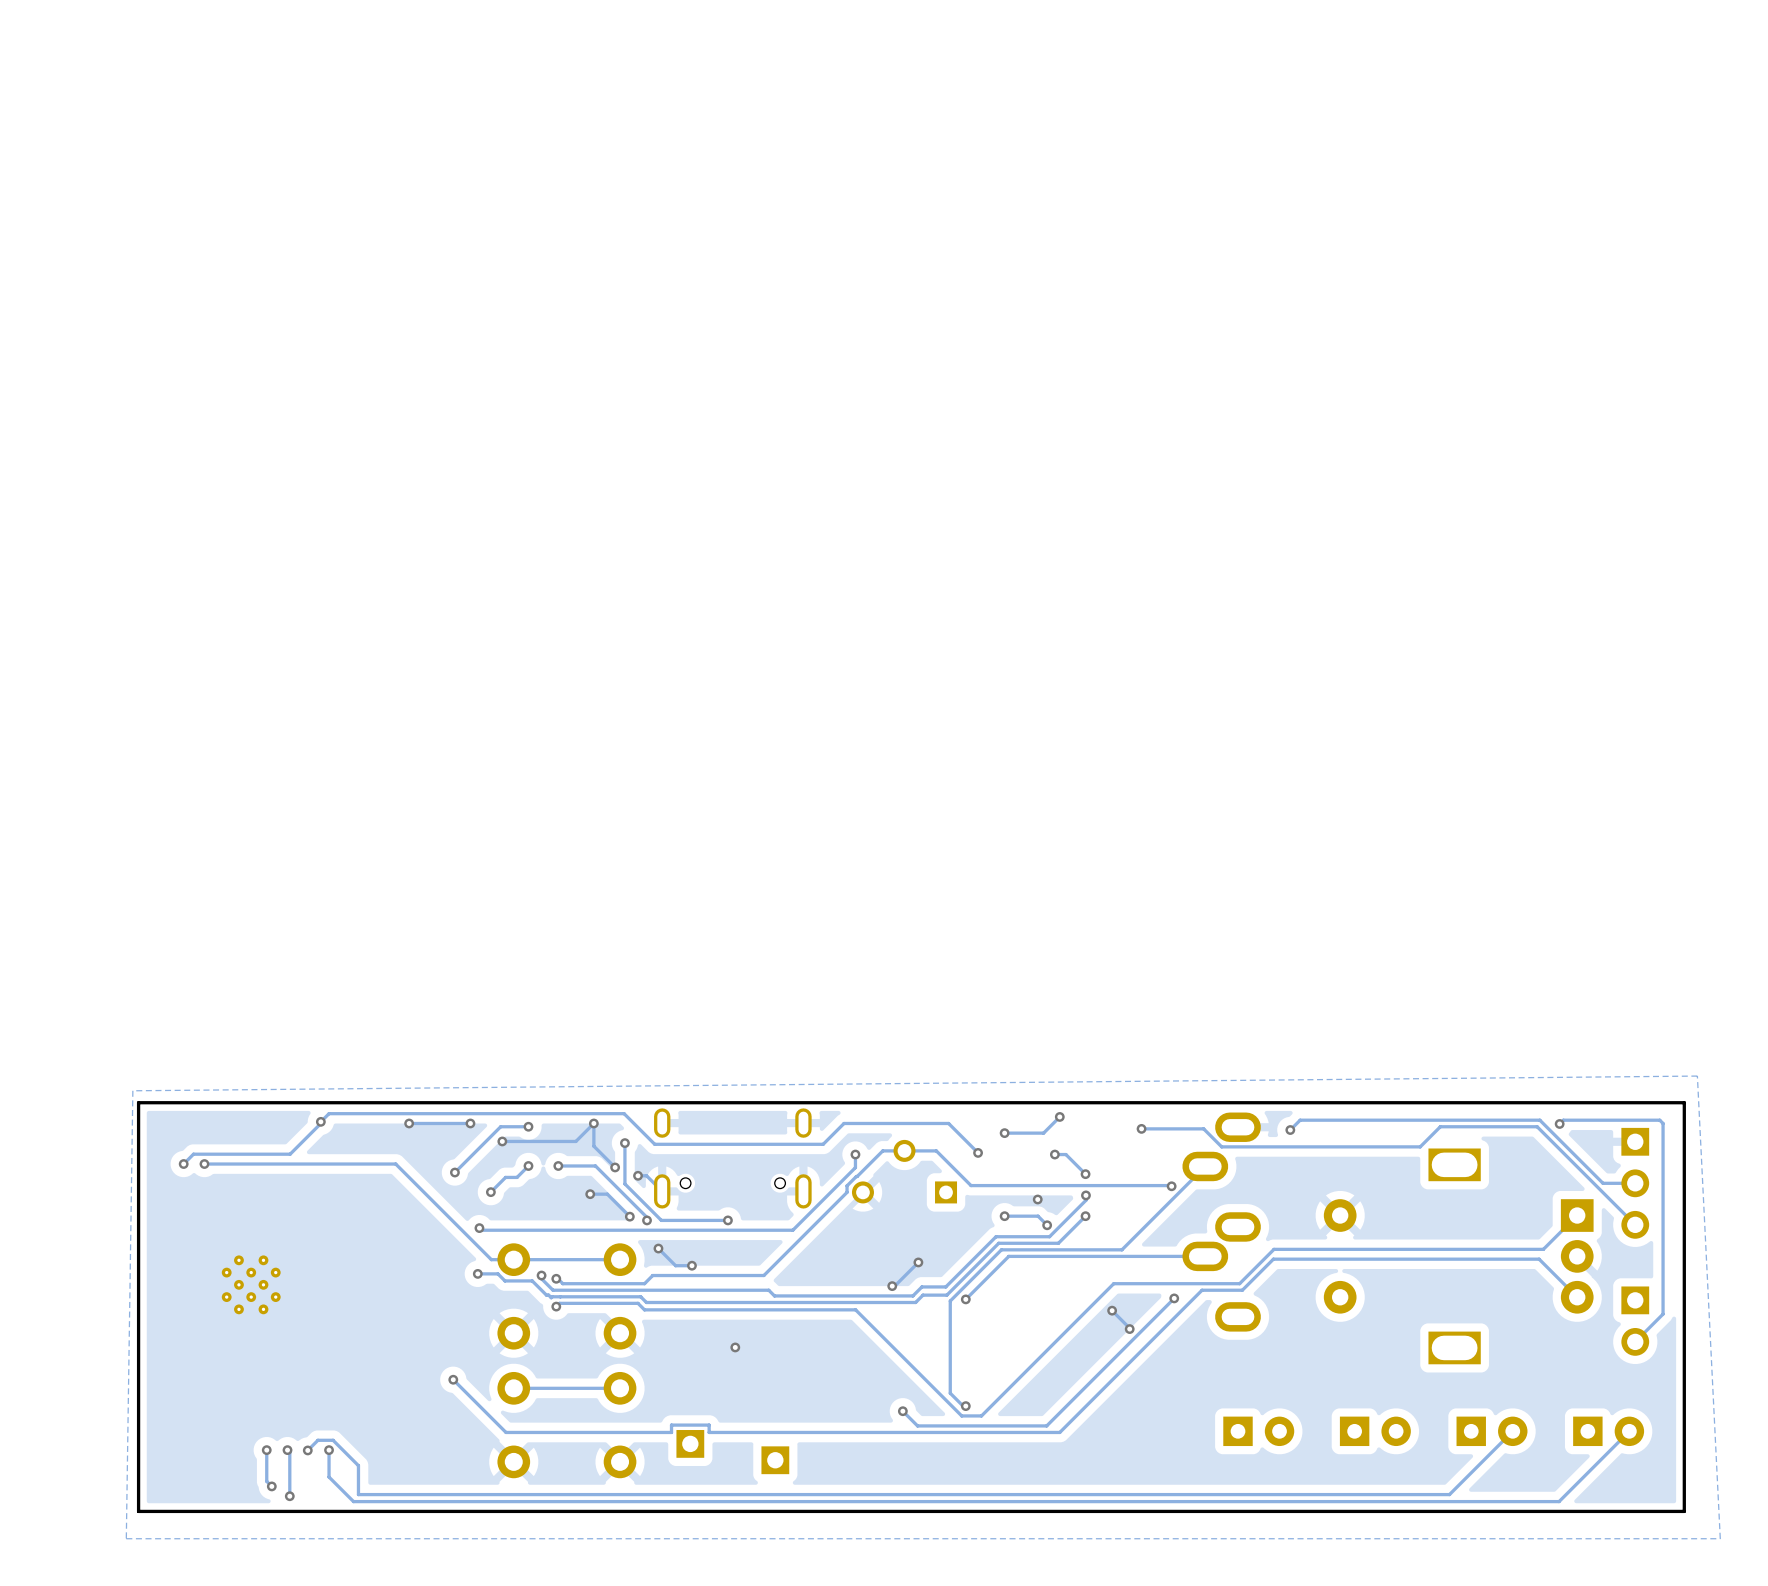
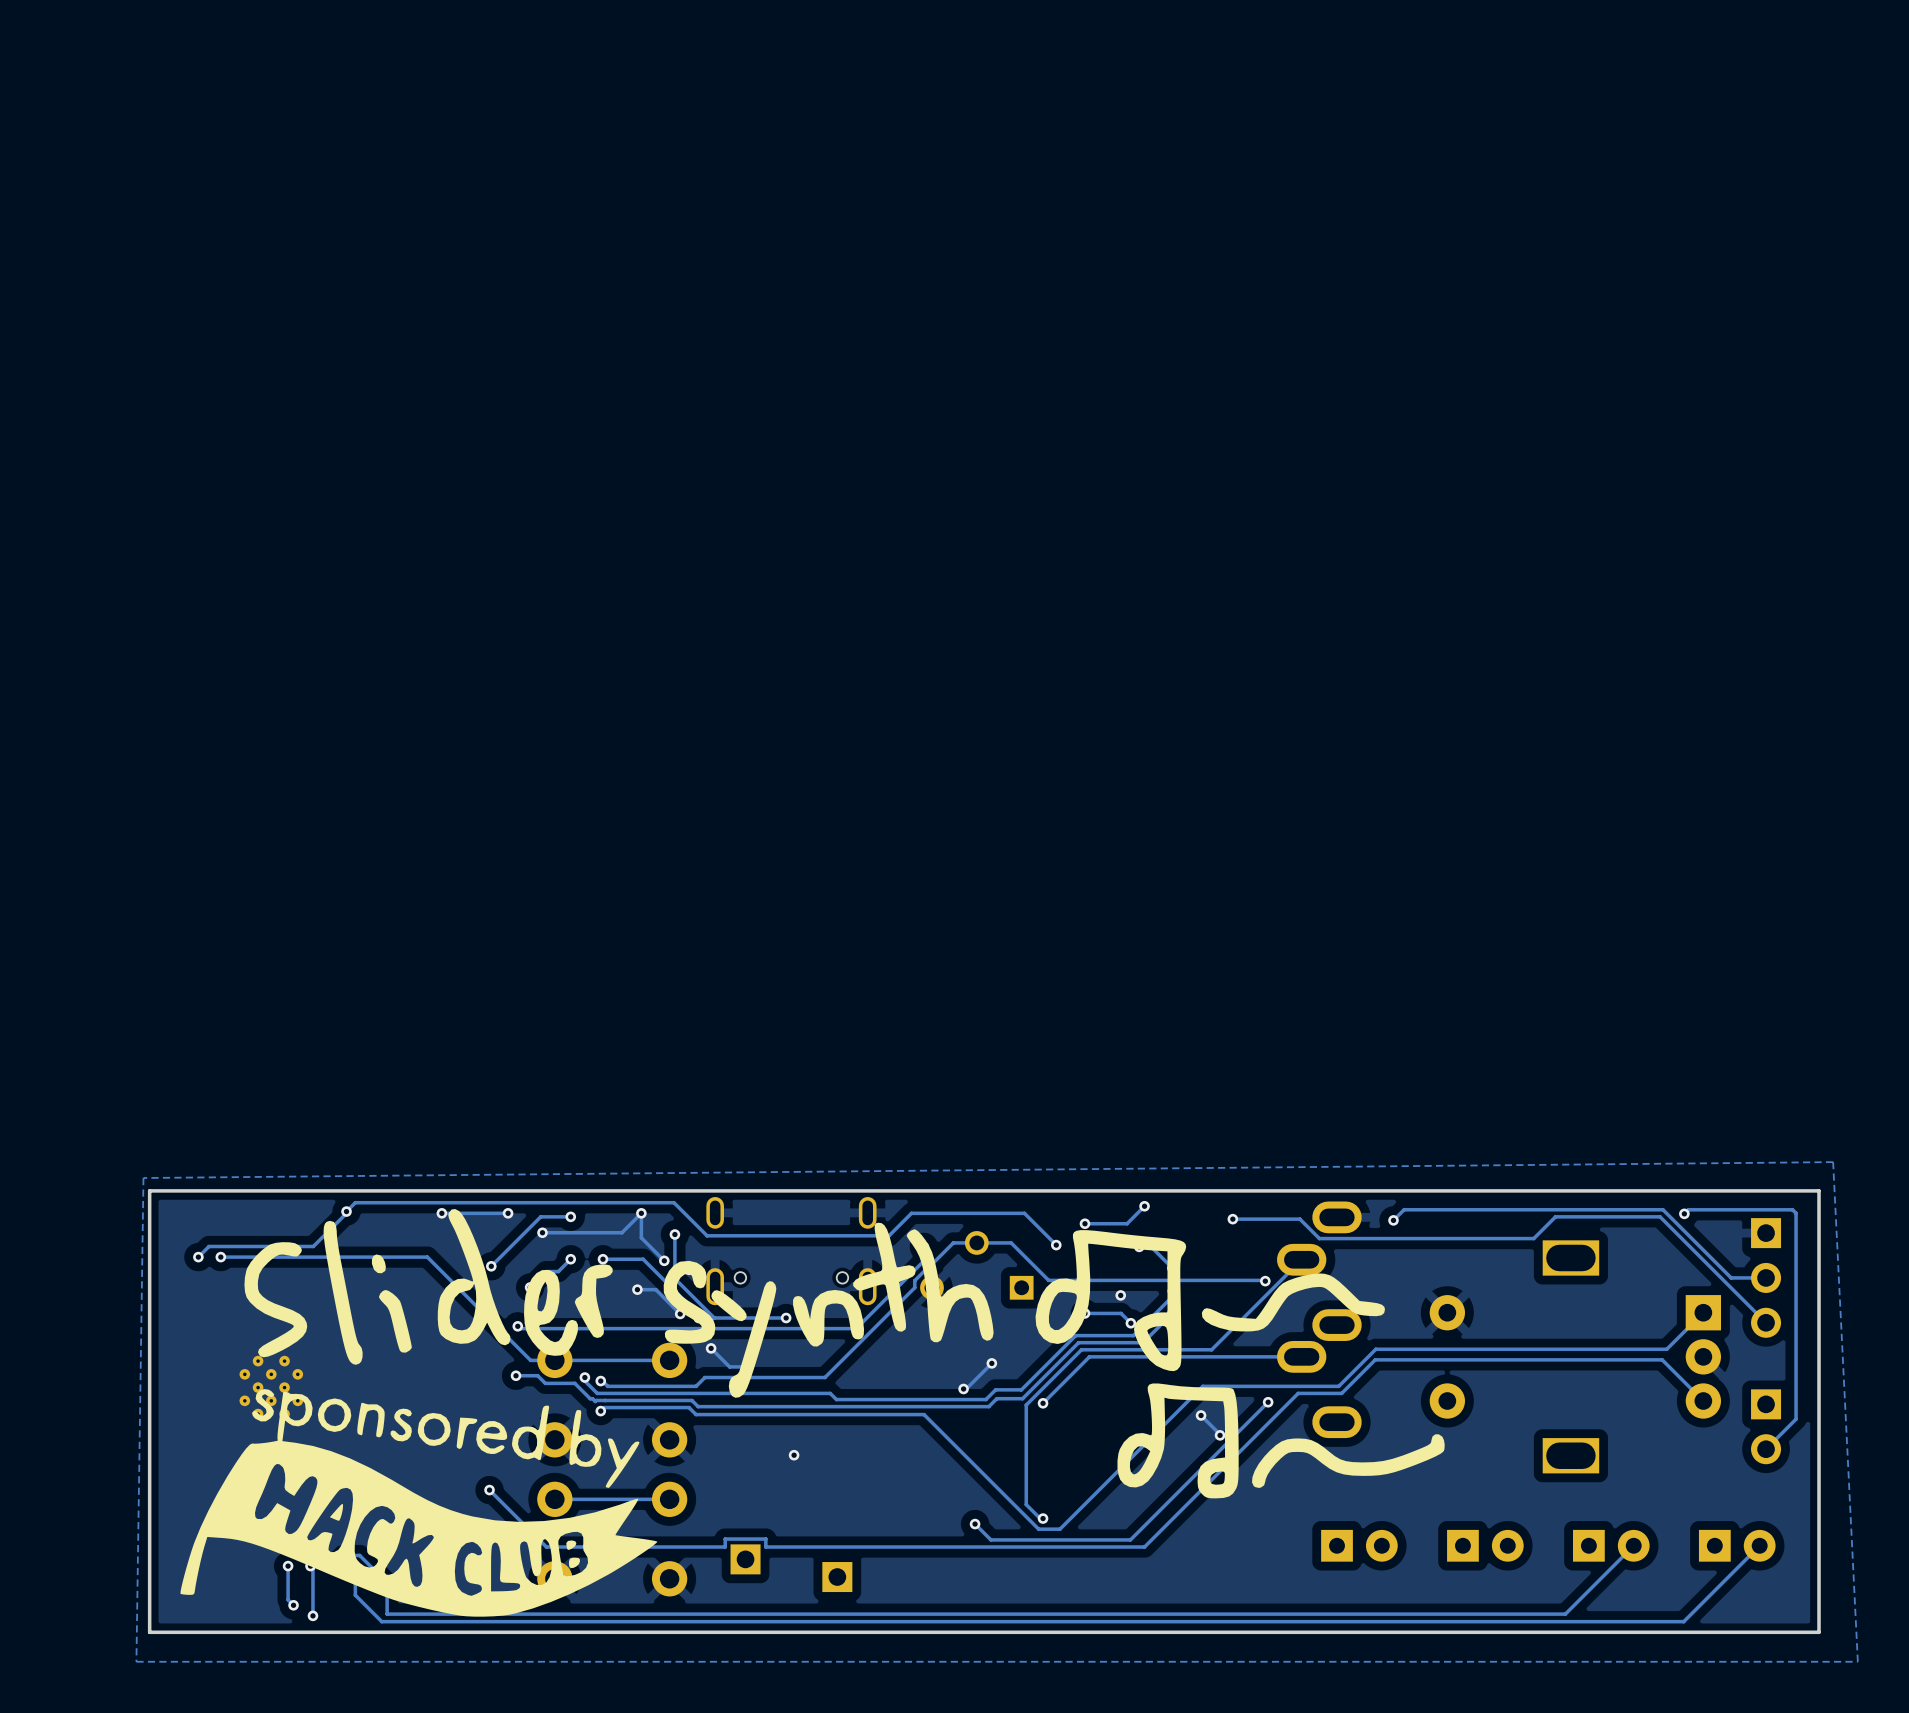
drawing: none -> [180, 1209, 1445, 1617]

